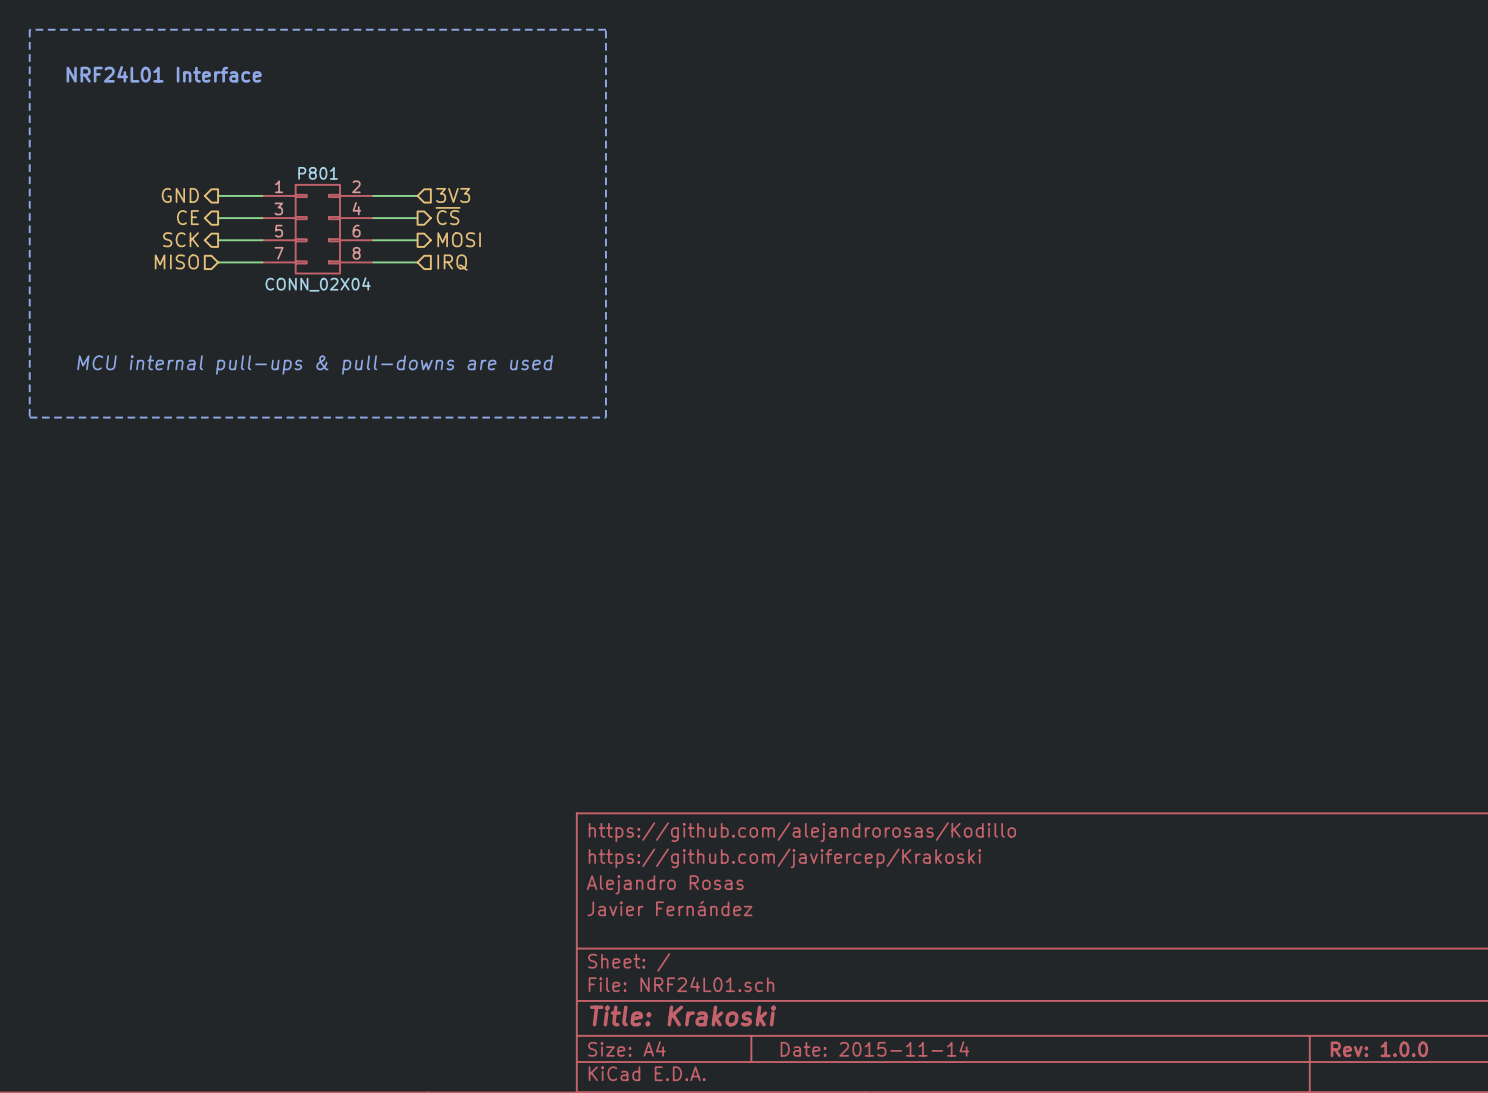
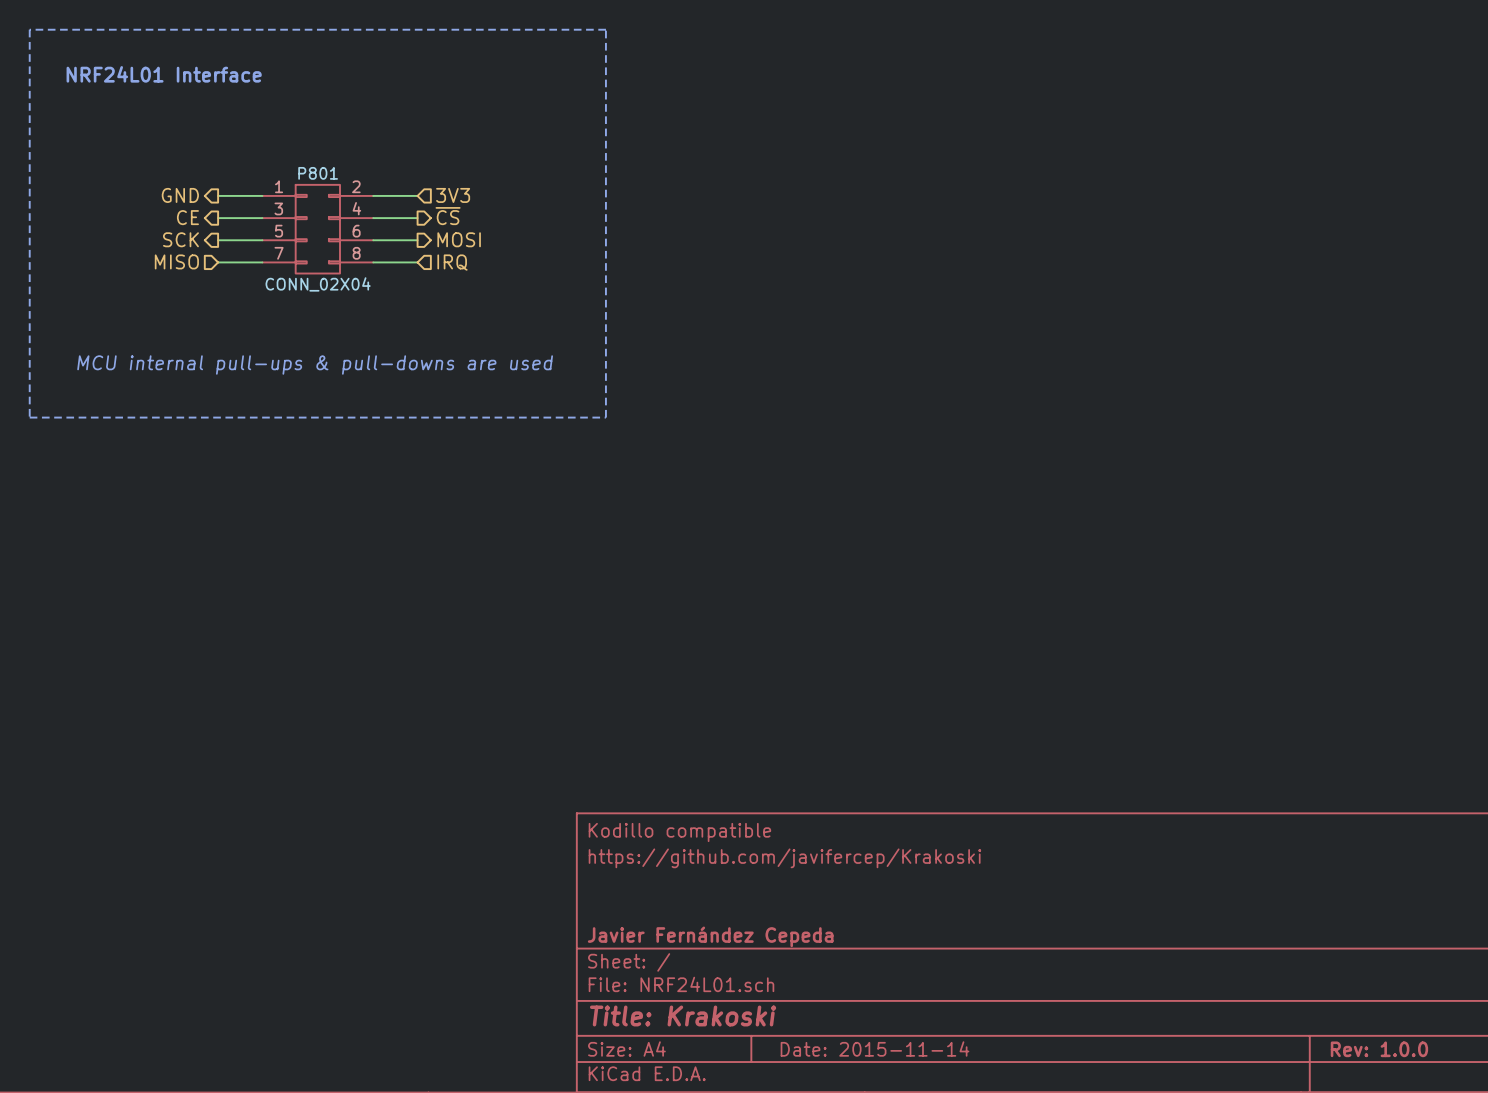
title block: https://github.com/alejandrorosas/Kodillo (802, 832) -> Kodillo compatible (679, 832)
title block: Alejandro Rosas (665, 884) -> none
title block: Javier Fernández (669, 908) -> Javier Fernández Cepeda (710, 936)

